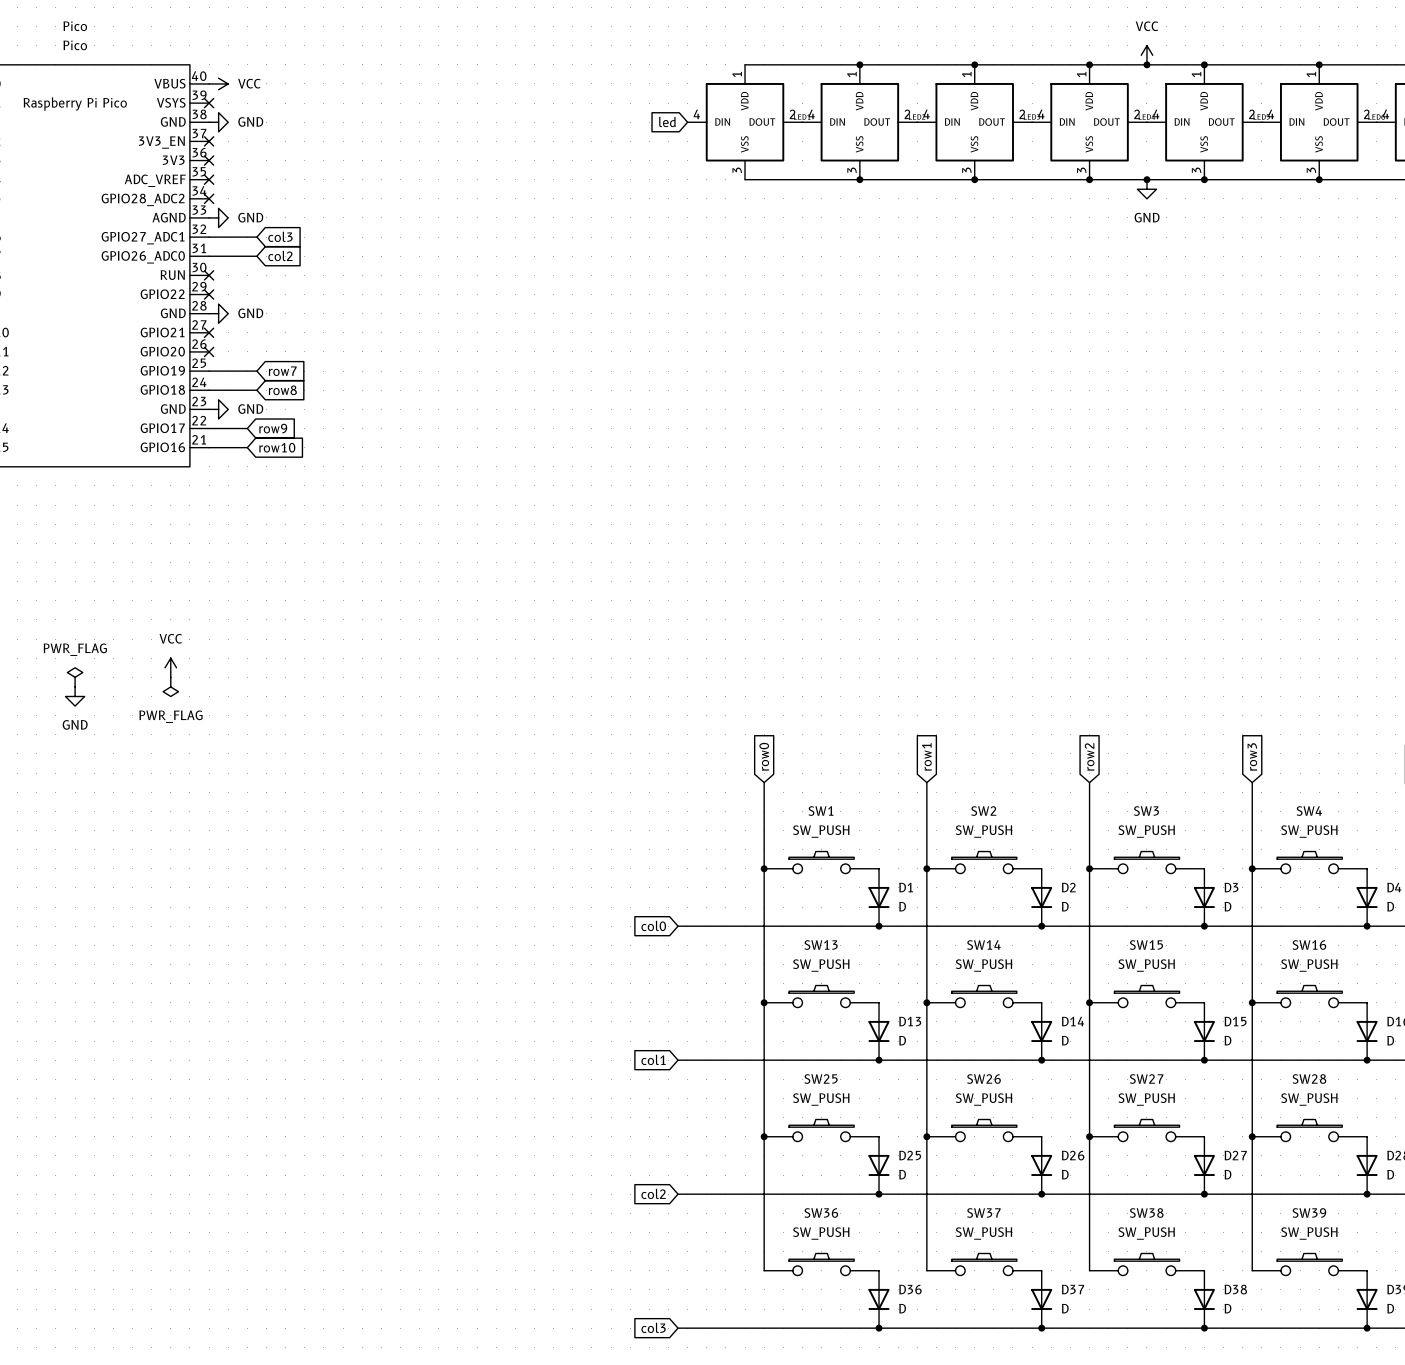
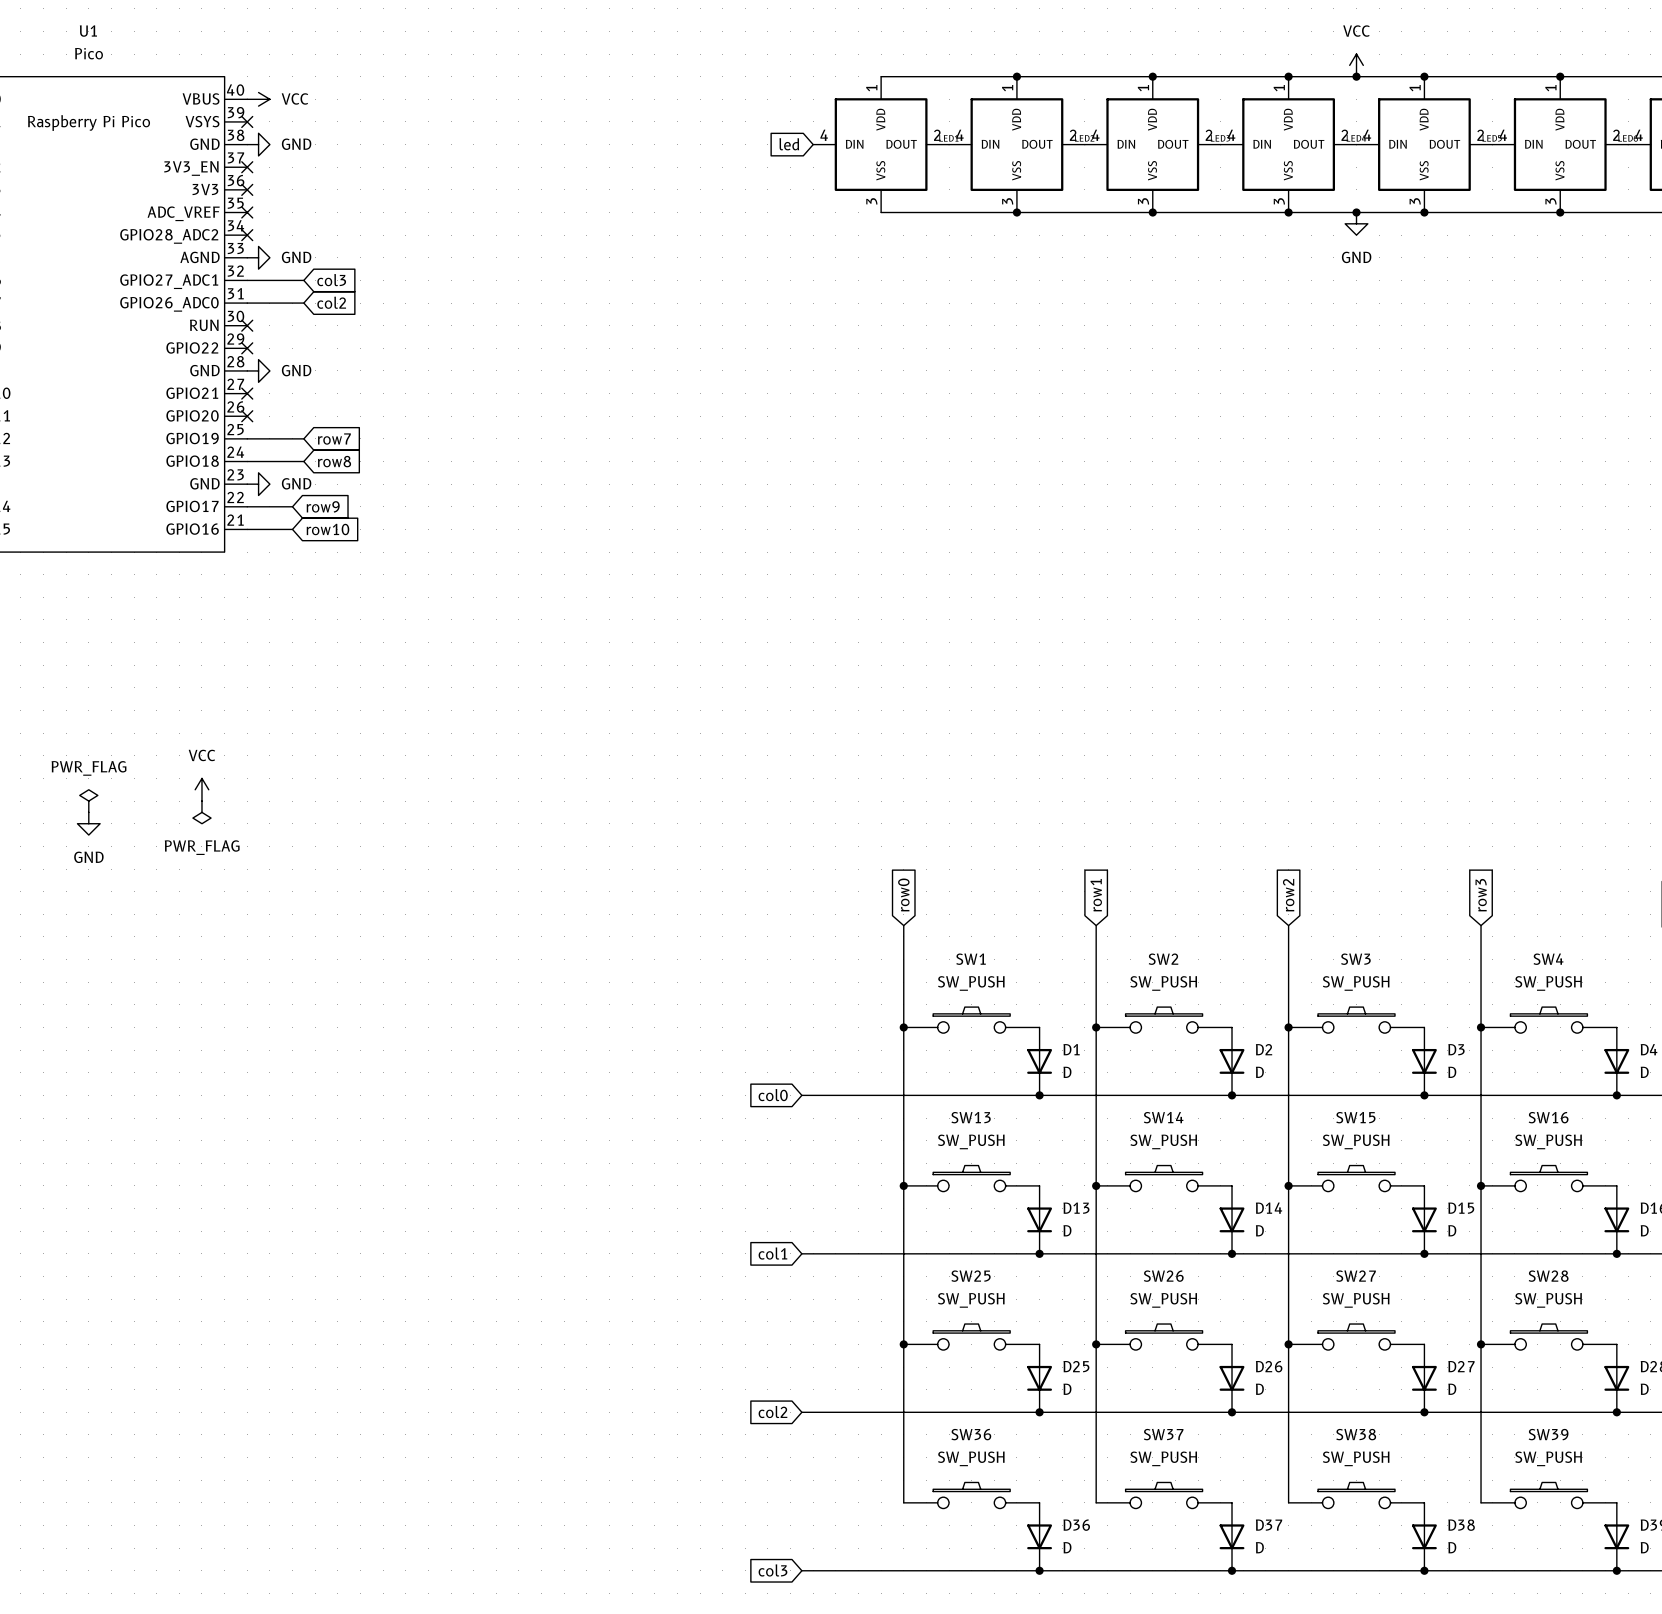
Pico name: Pico (75, 26) -> U1 (88, 31)

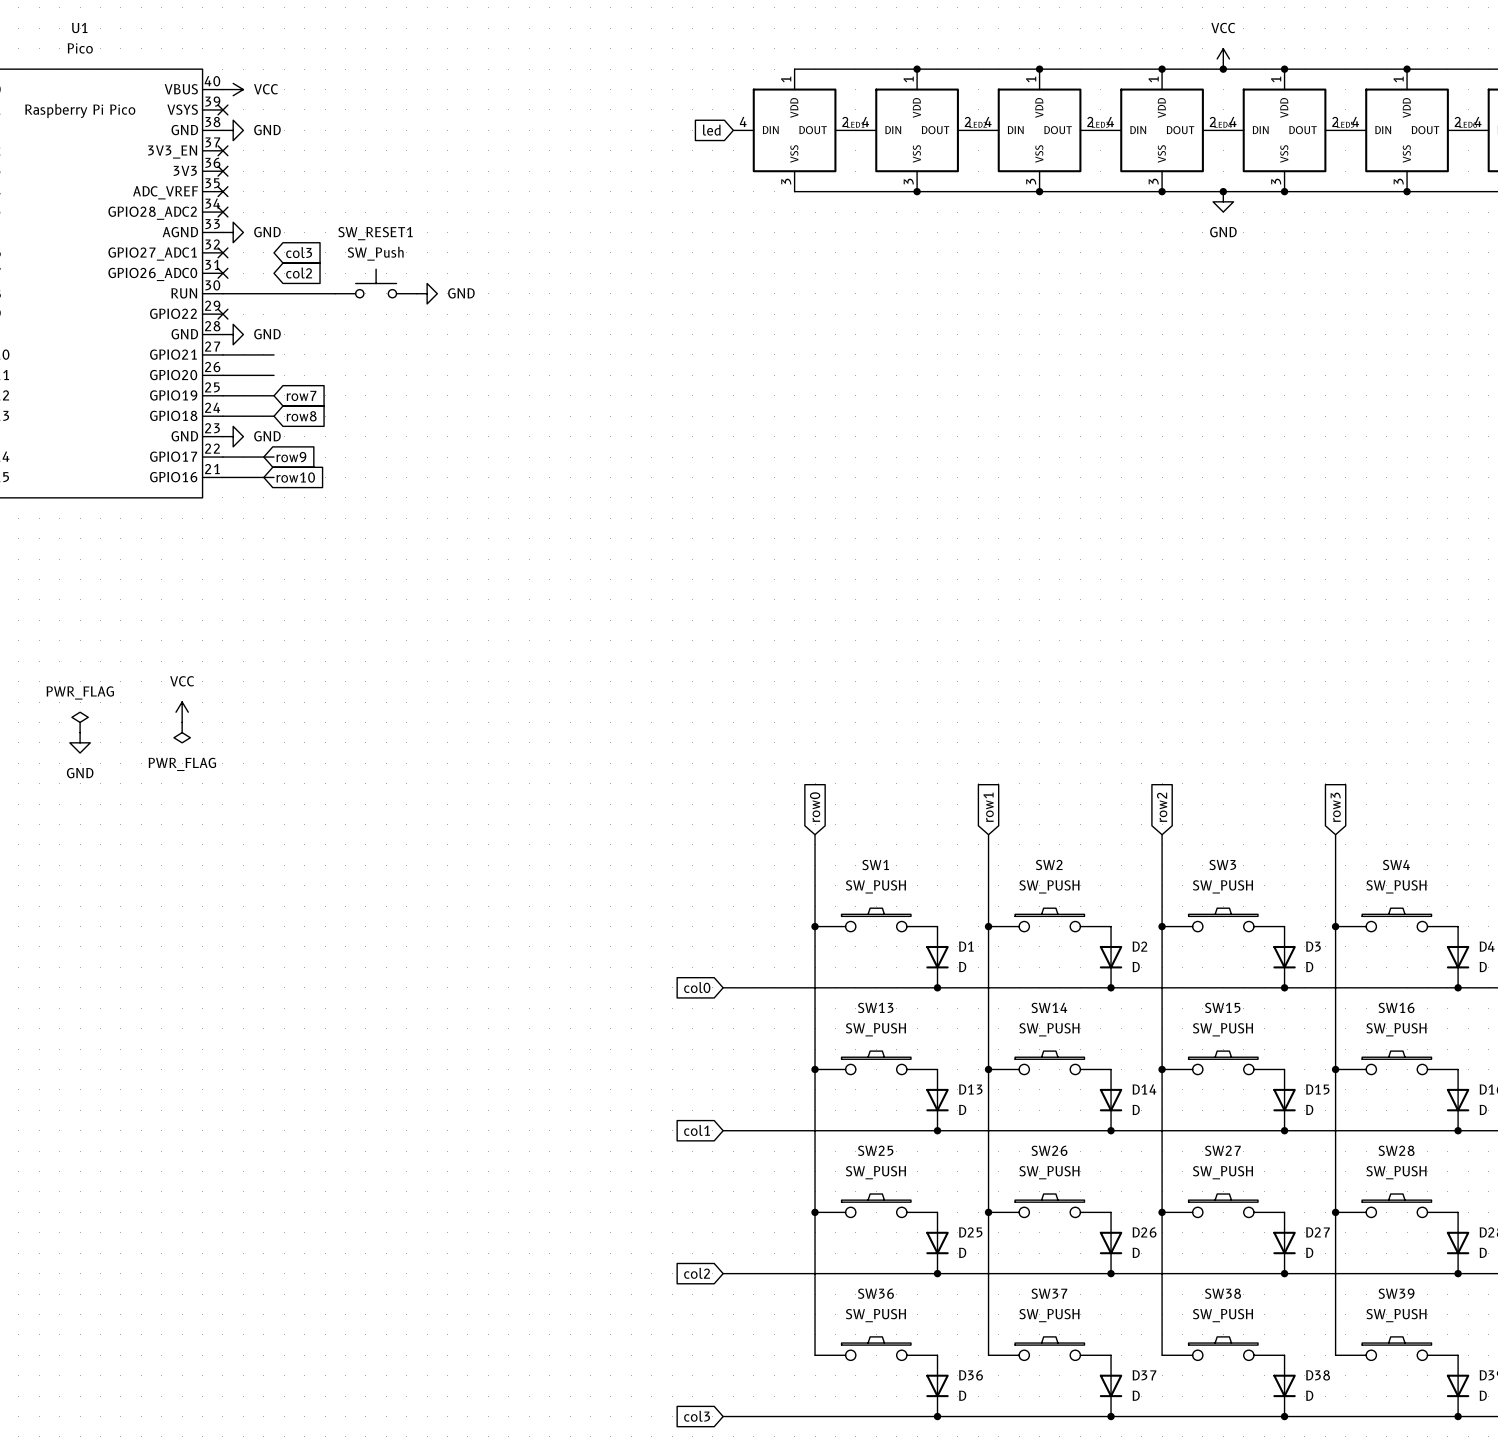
wire: (247, 280) (303, 280) -> (222, 354) (274, 354)
no-connect mark: none -> (222, 252)
wire: (247, 303) (303, 303) -> (222, 375) (274, 375)
no-connect mark: none -> (222, 273)
SW_RESET1: none -> SW_Push (376, 283)
wire: none -> (222, 293) (335, 293)
no-connect mark: (247, 325) -> none
power symbol: none -> GND (427, 293)
no-connect mark: (247, 393) -> none
no-connect mark: (247, 416) -> none
wire: none -> (263, 457) (274, 457)
wire: none -> (263, 477) (274, 477)

